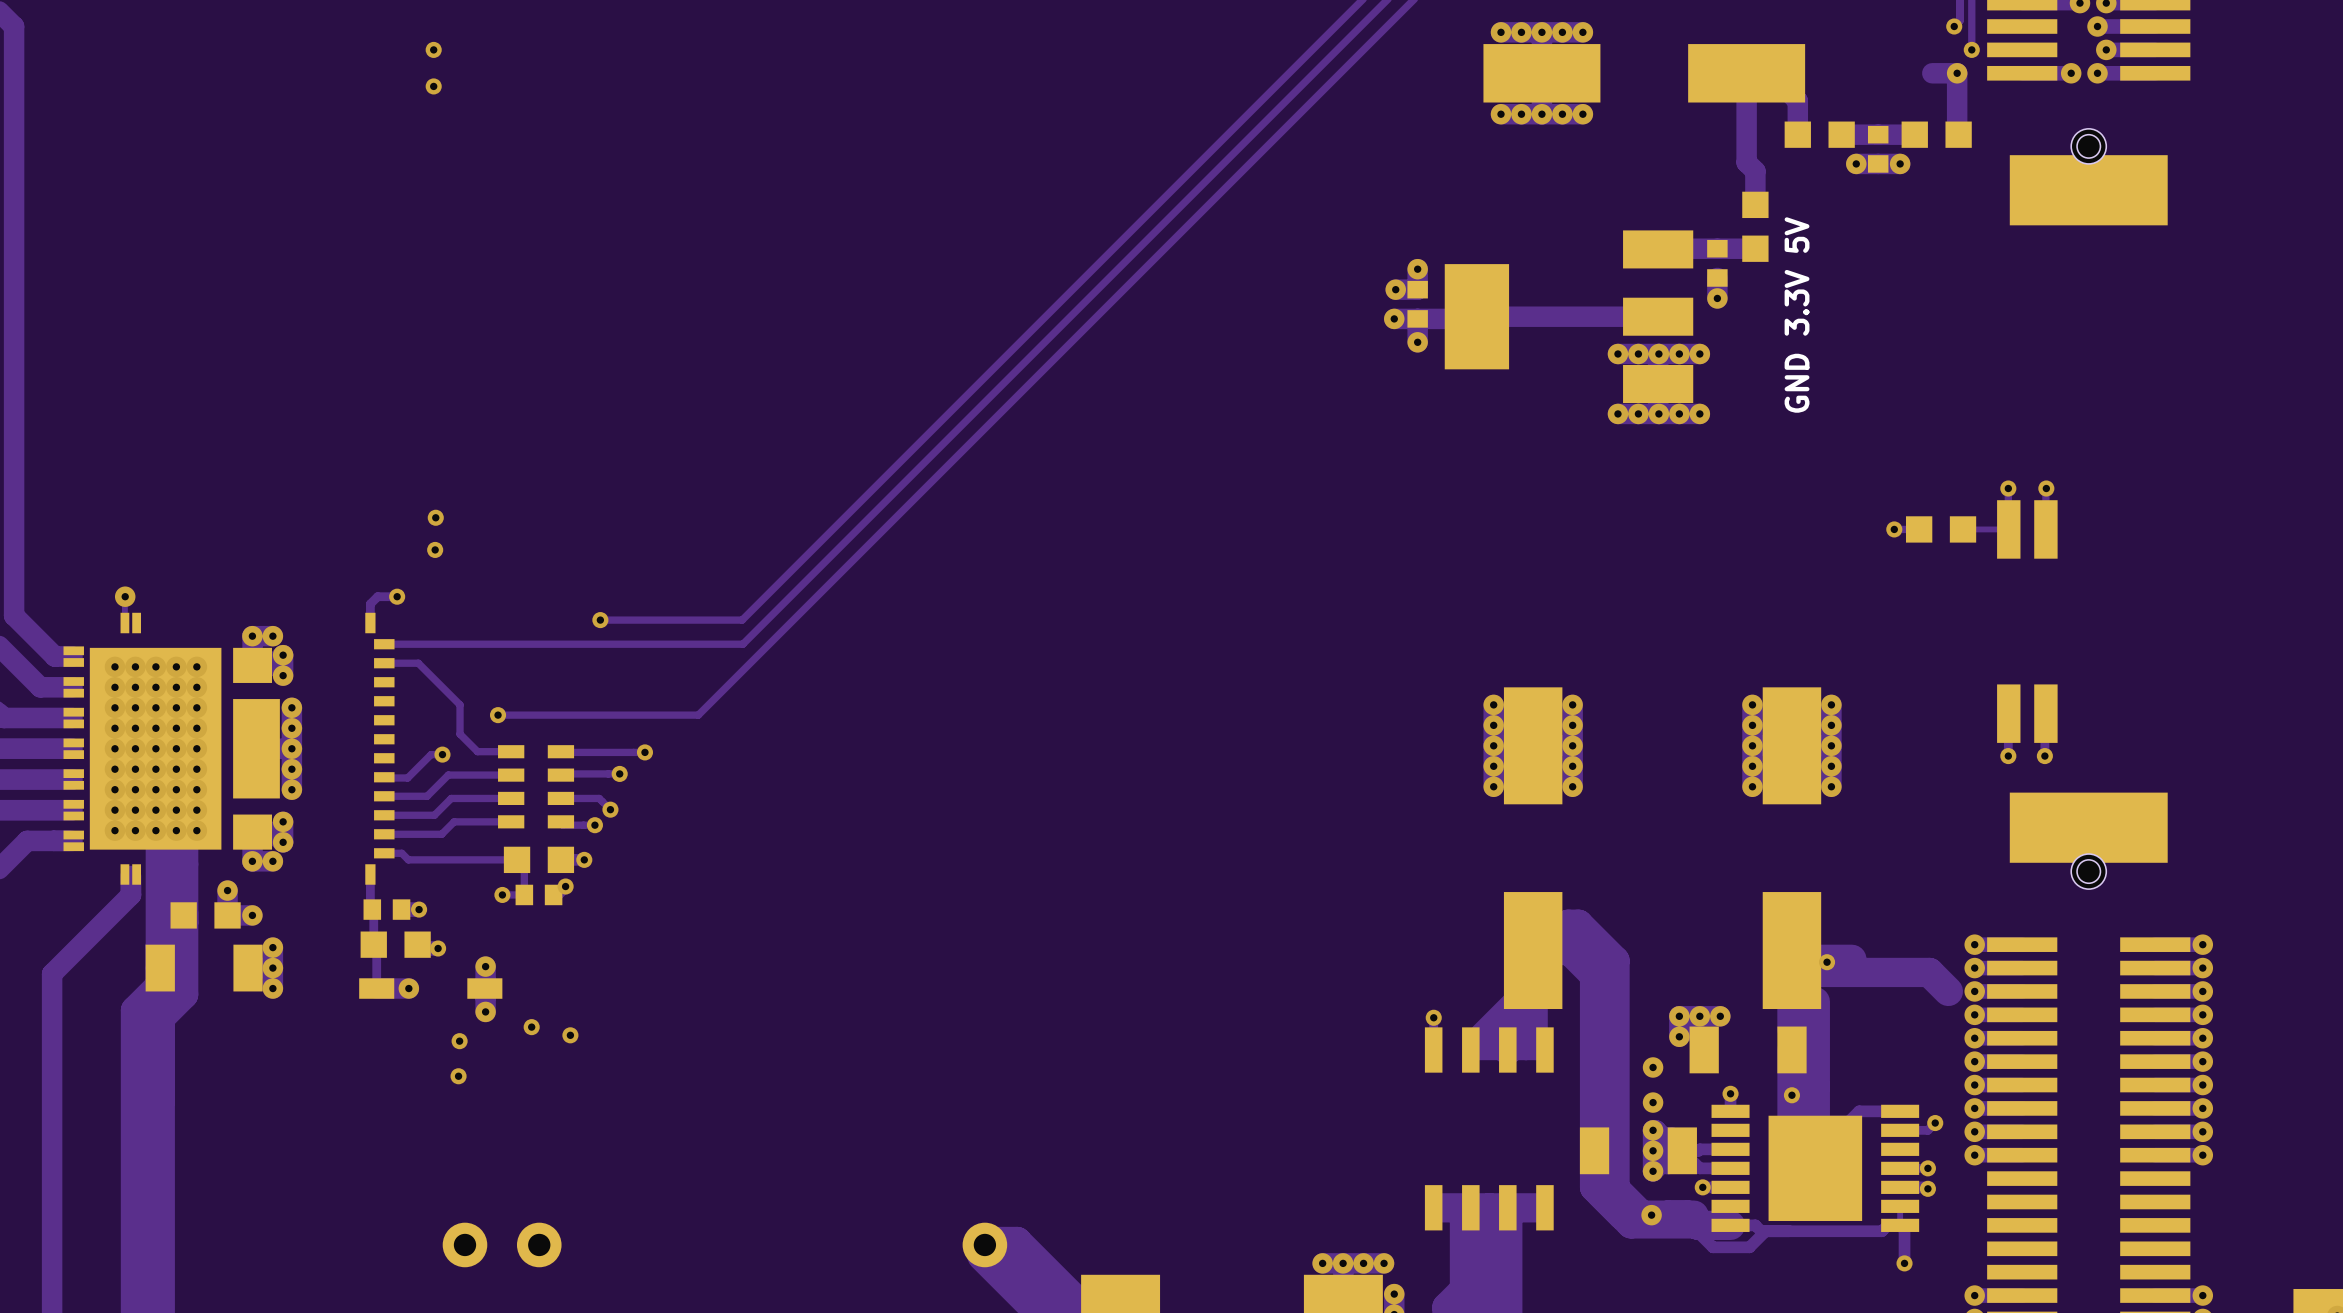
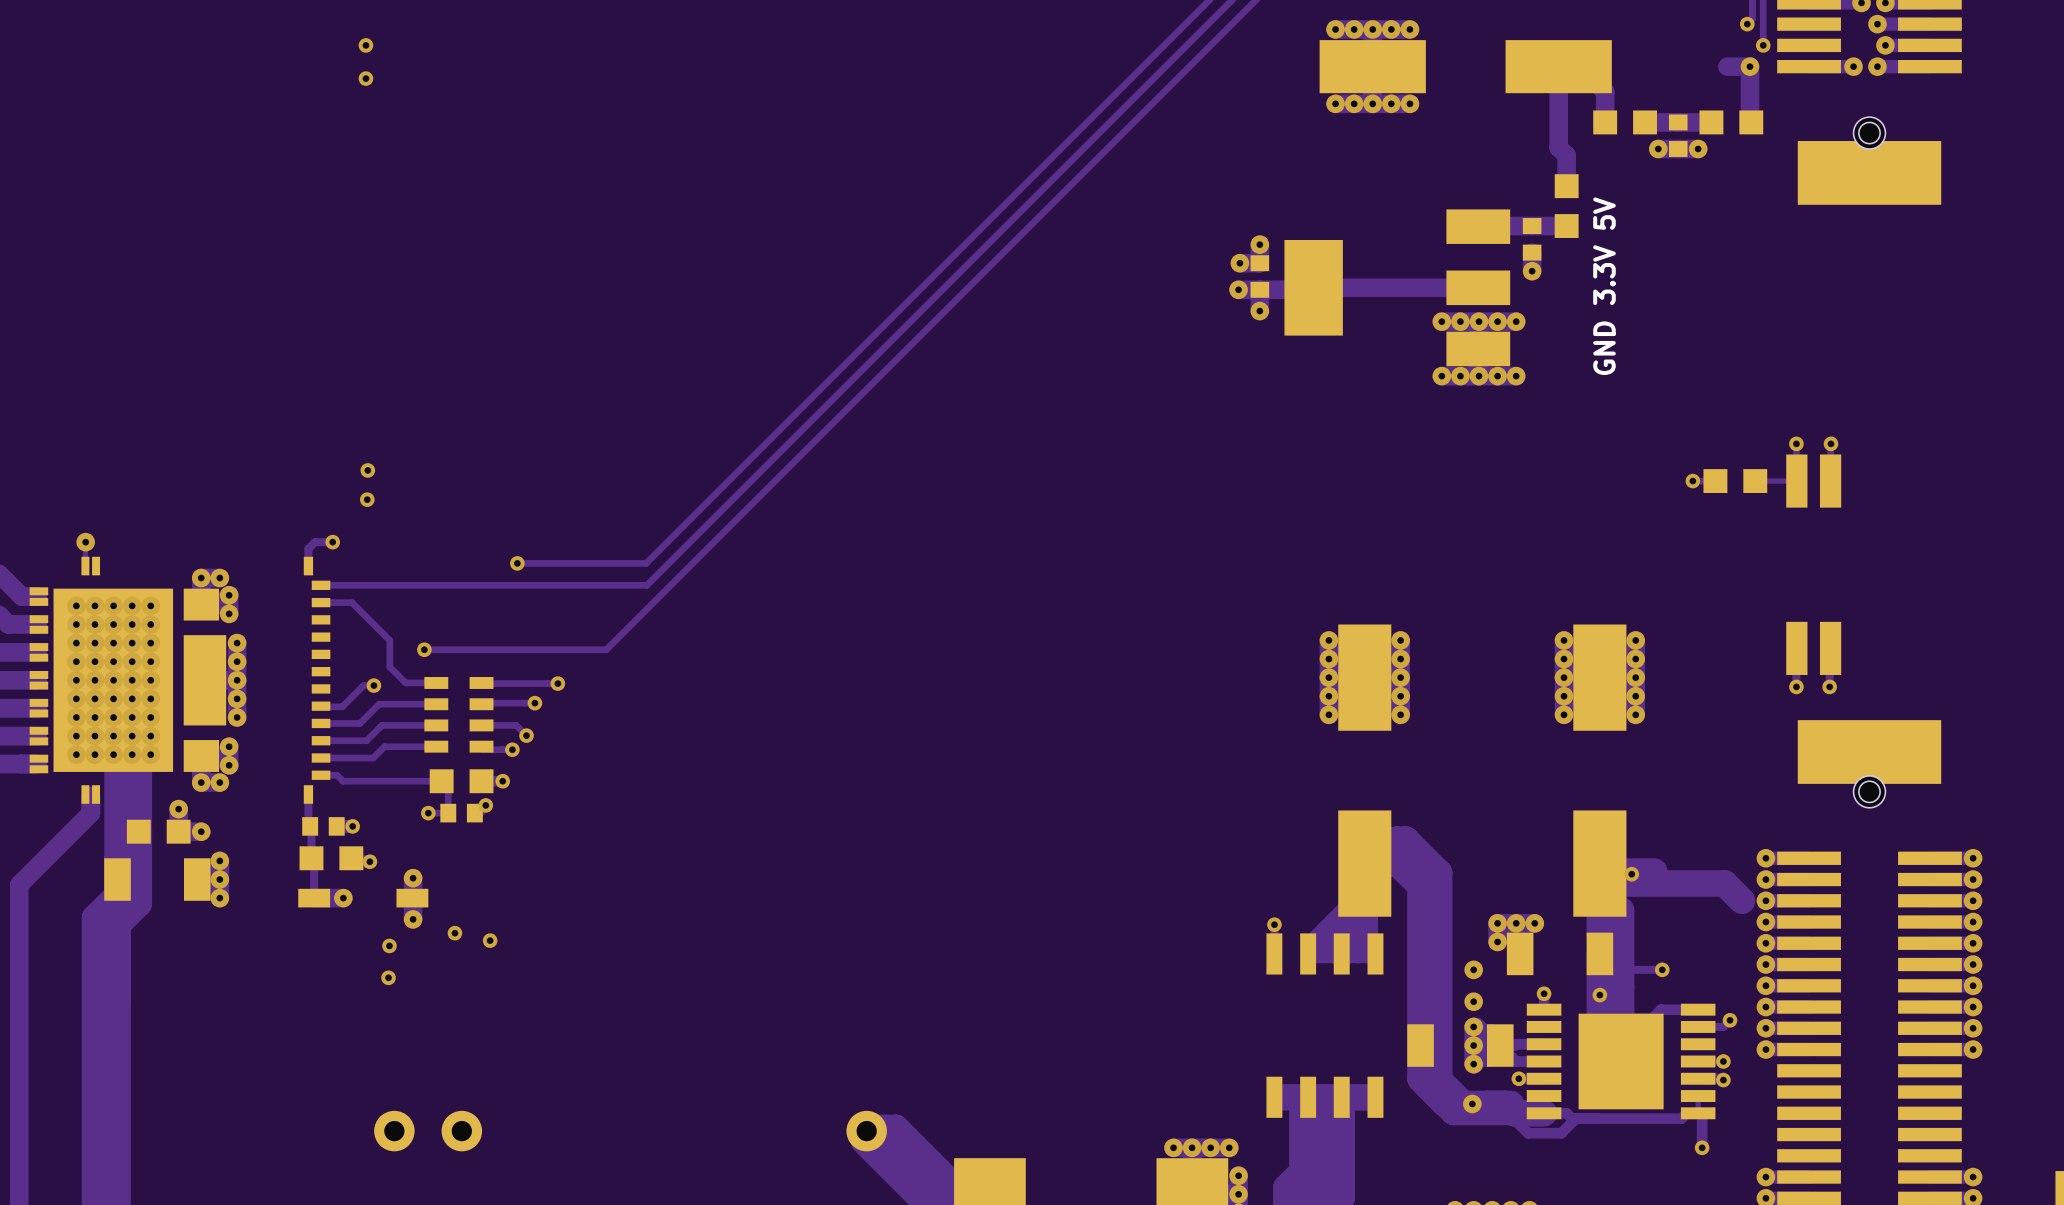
track: none -> (1625, 969) (1662, 969)
via: none -> (1662, 969)

